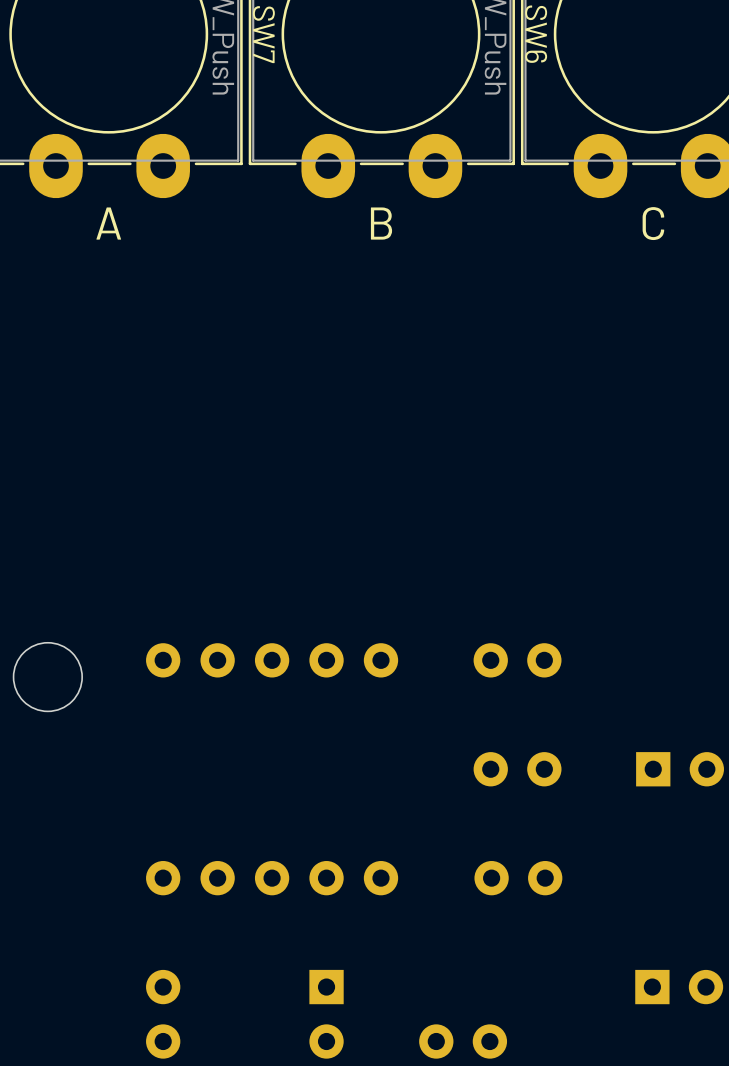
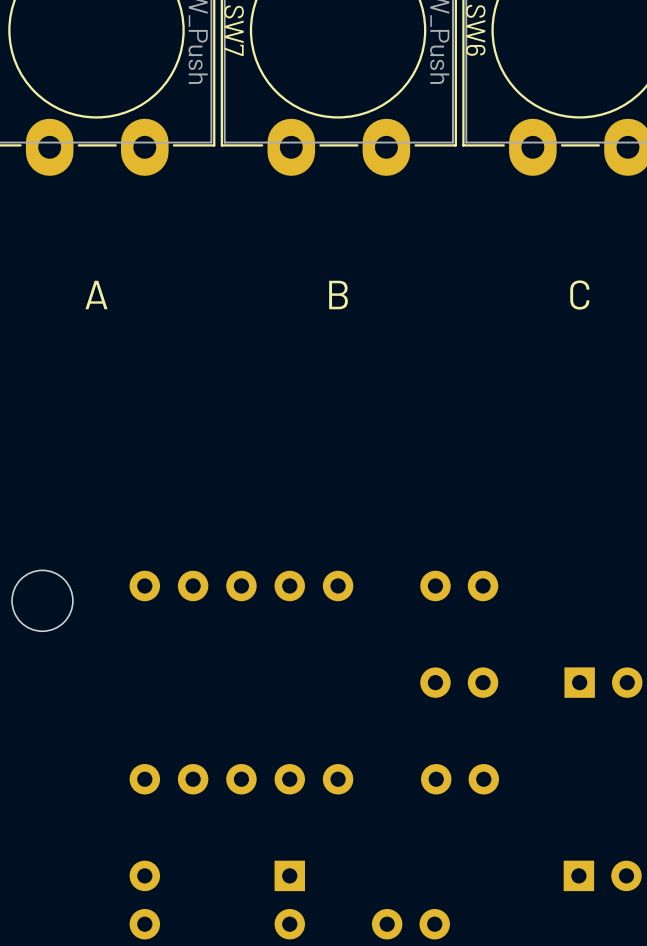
text position: A (108, 223) -> A (96, 295)
text position: B (381, 223) -> B (338, 295)
text position: C (653, 223) -> C (579, 295)

